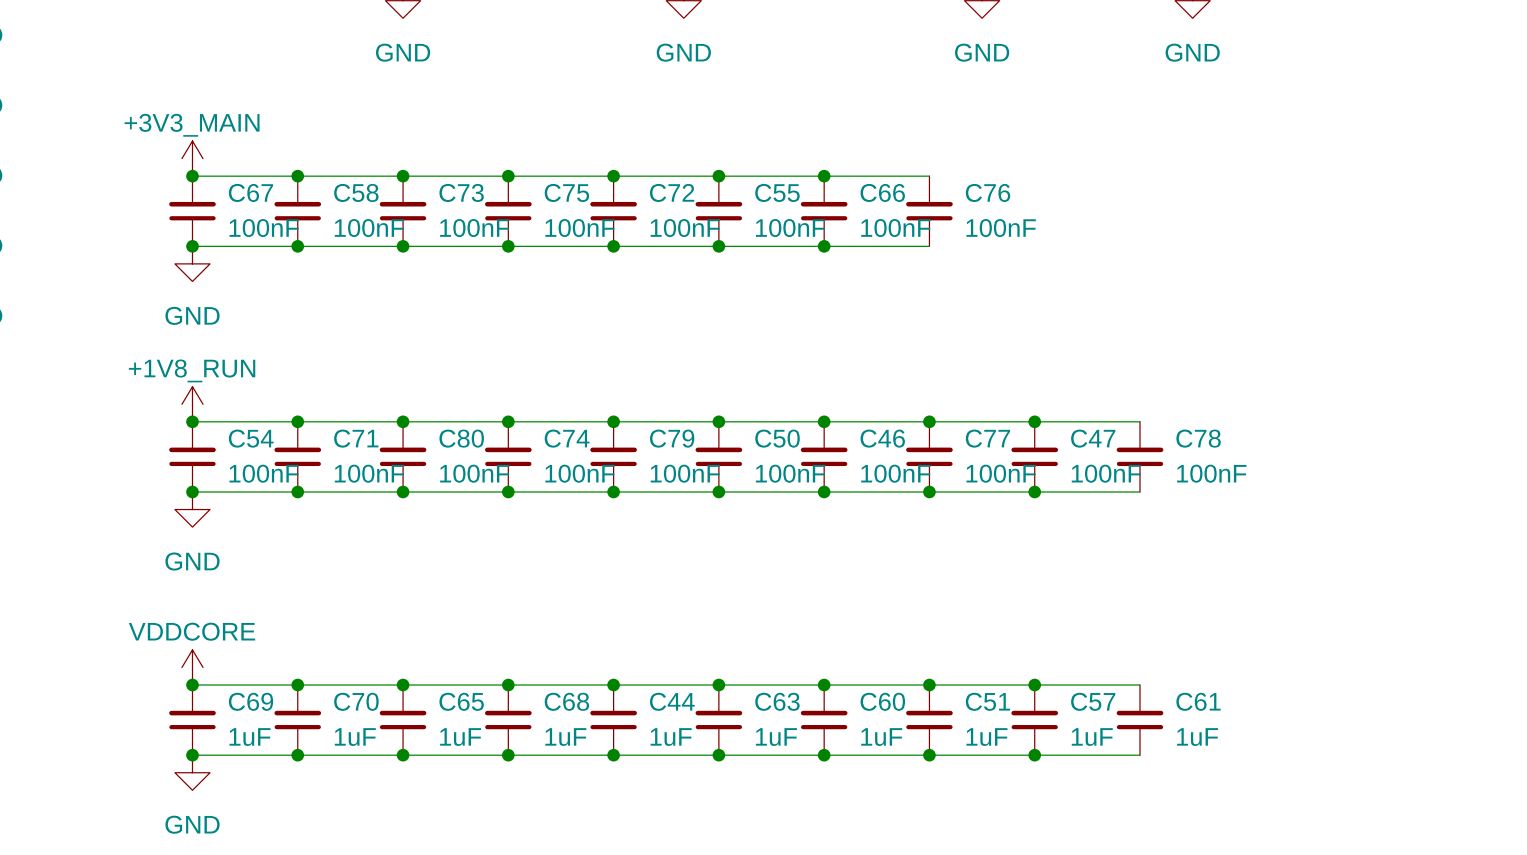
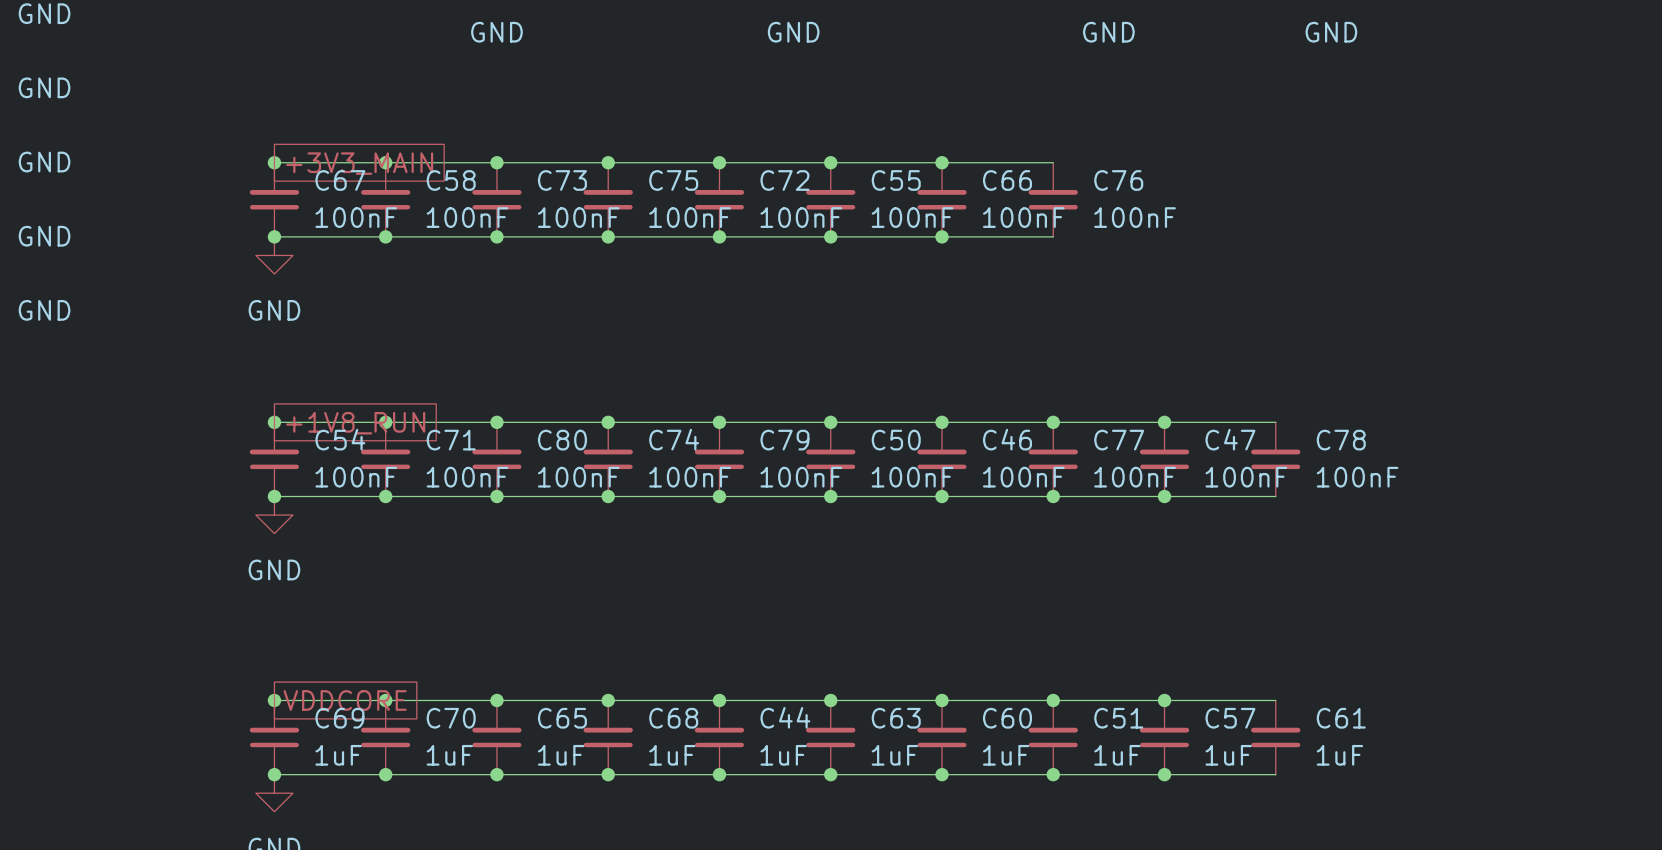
power symbol: +3V3_MAIN (192, 158) -> none
global label: none -> +3V3_MAIN (359, 163)
power symbol: +1V8_RUN (192, 404) -> none
global label: none -> +1V8_RUN (355, 423)
power symbol: VDDCORE (192, 667) -> none
global label: none -> VDDCORE (345, 700)

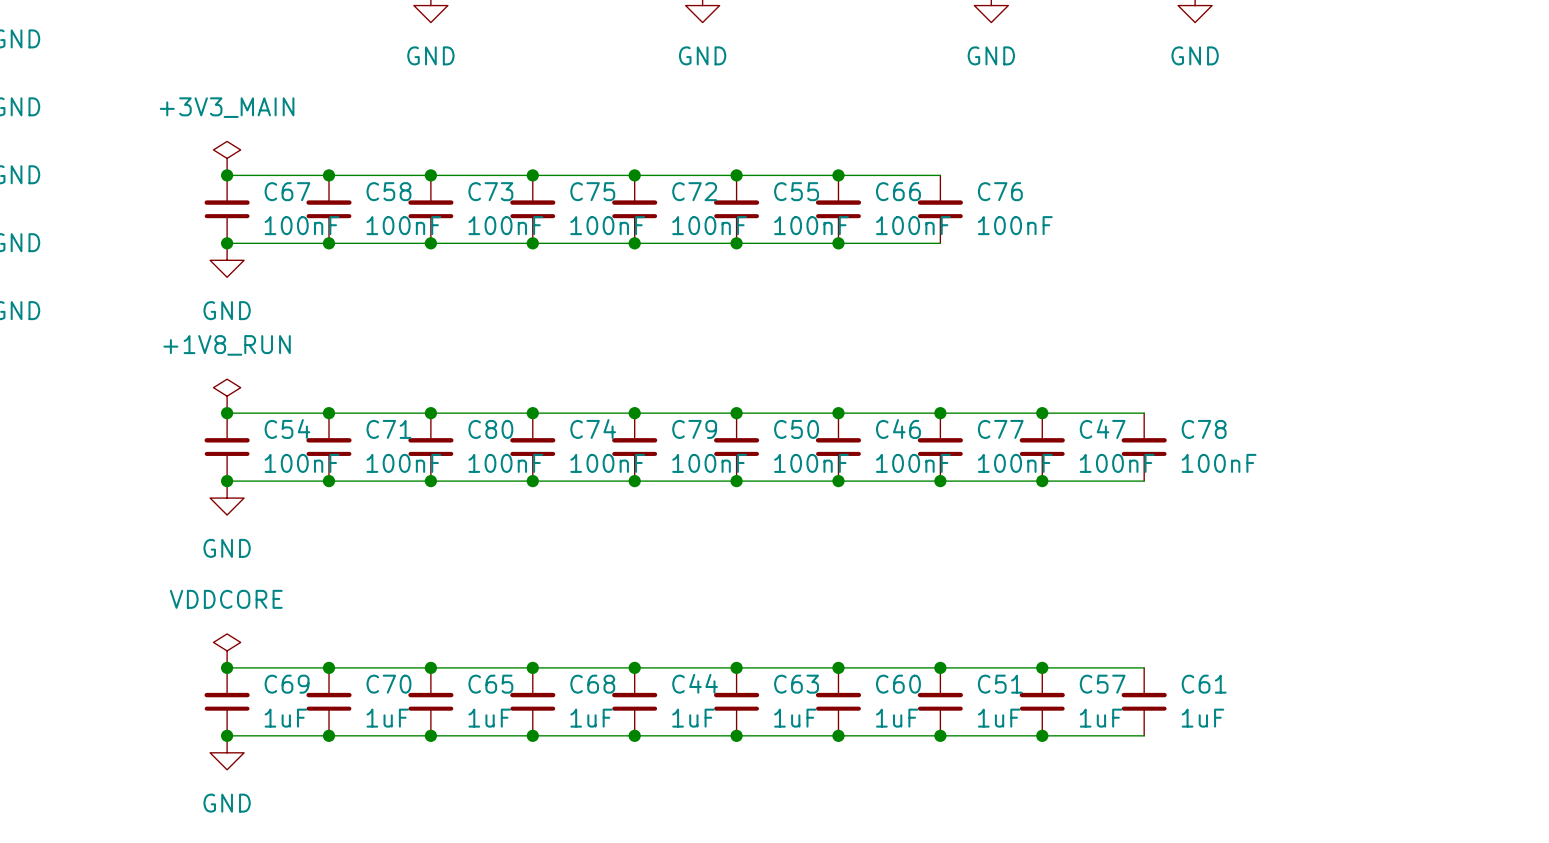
power symbol: none -> +3V3_MAIN (227, 158)
global label: +3V3_MAIN (359, 163) -> none
power symbol: none -> +1V8_RUN (227, 396)
global label: +1V8_RUN (355, 423) -> none
power symbol: none -> VDDCORE (227, 650)
global label: VDDCORE (345, 700) -> none

